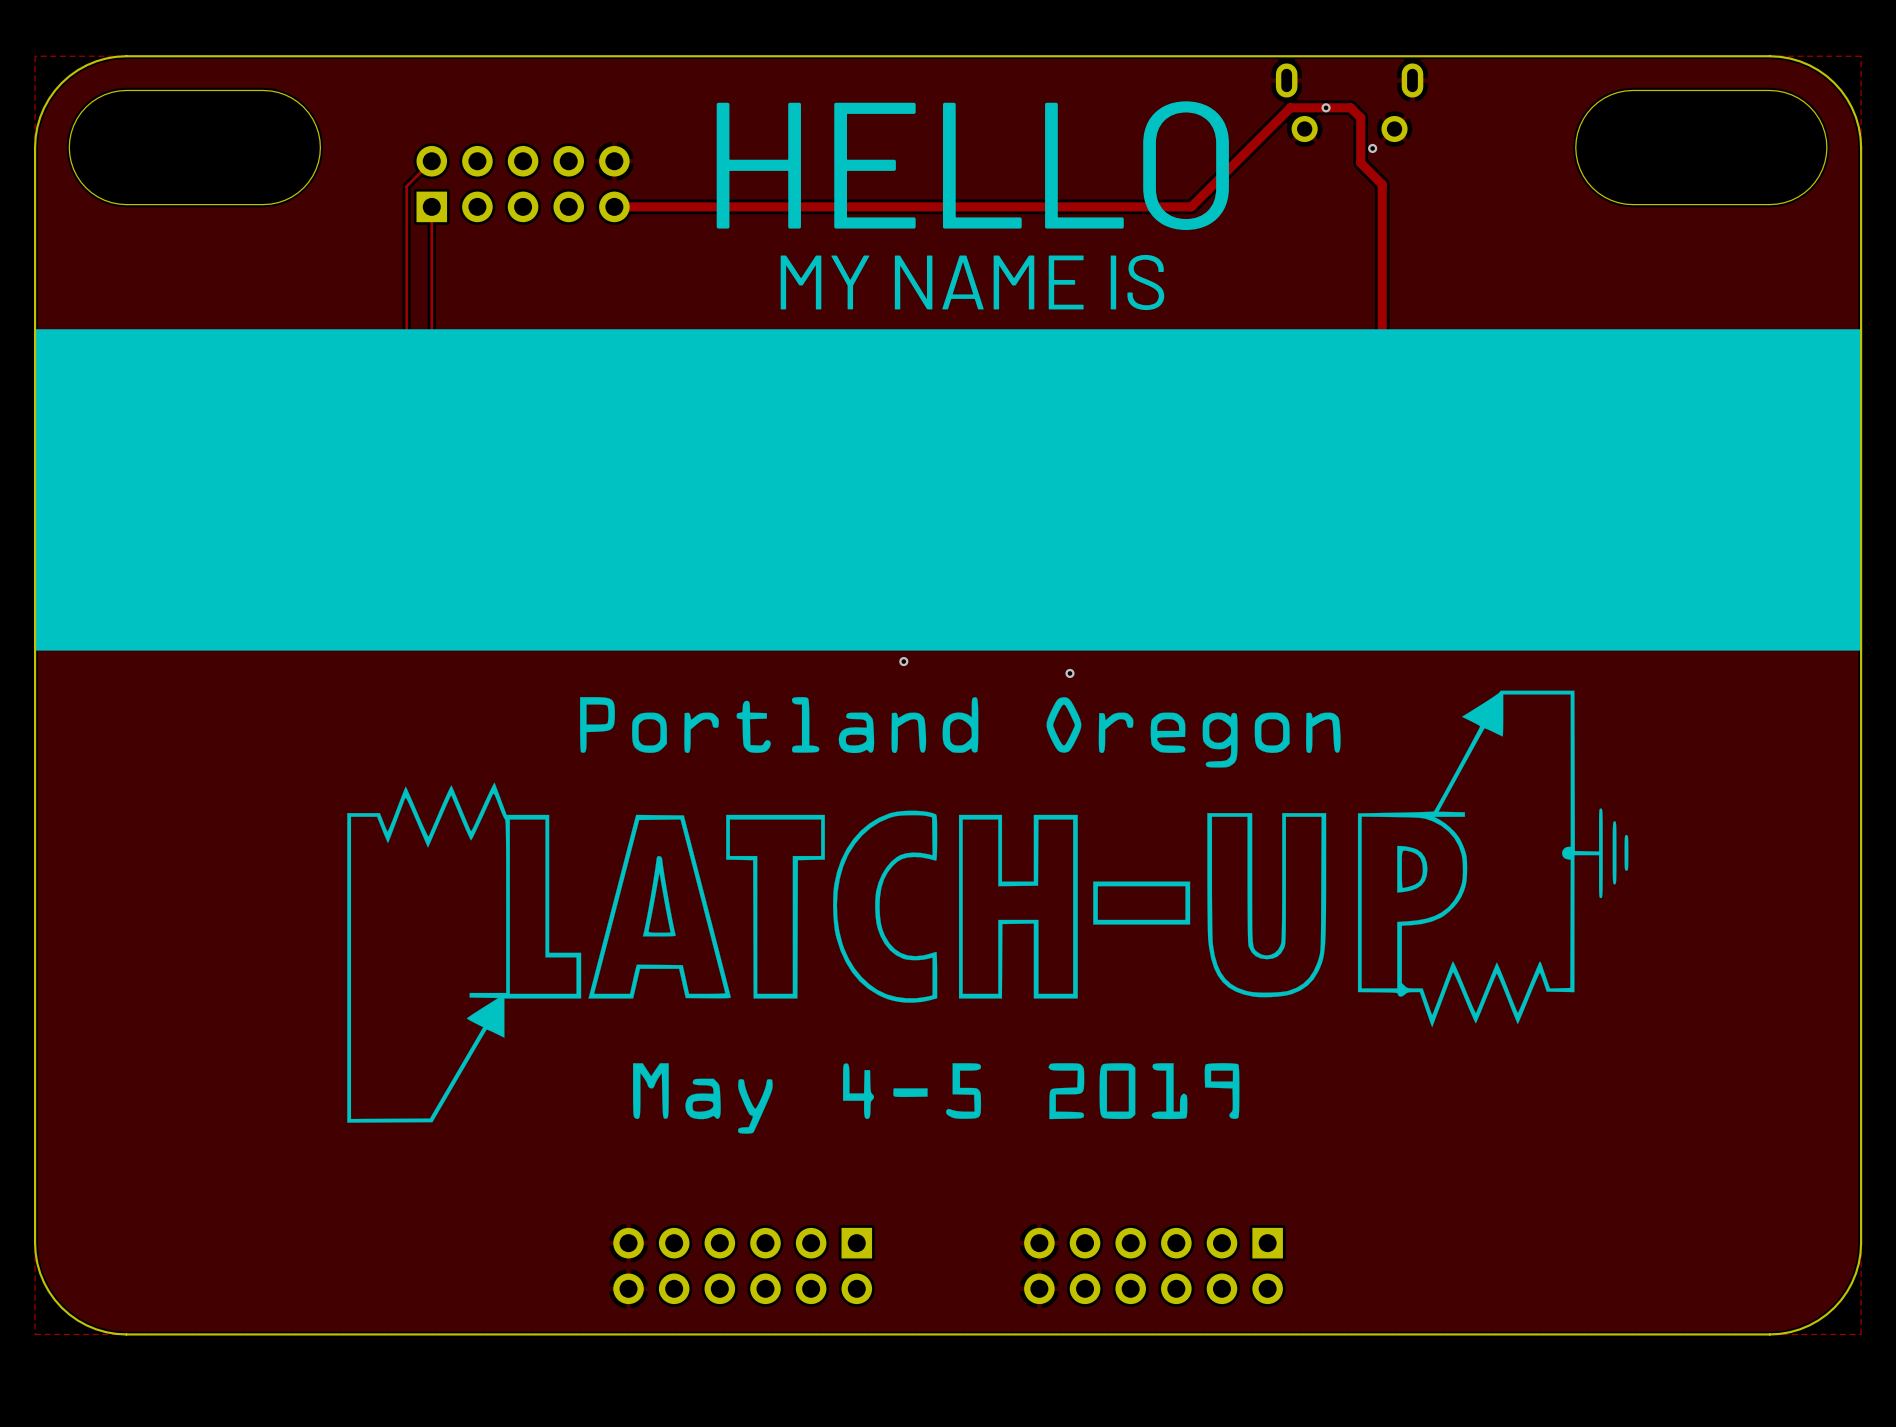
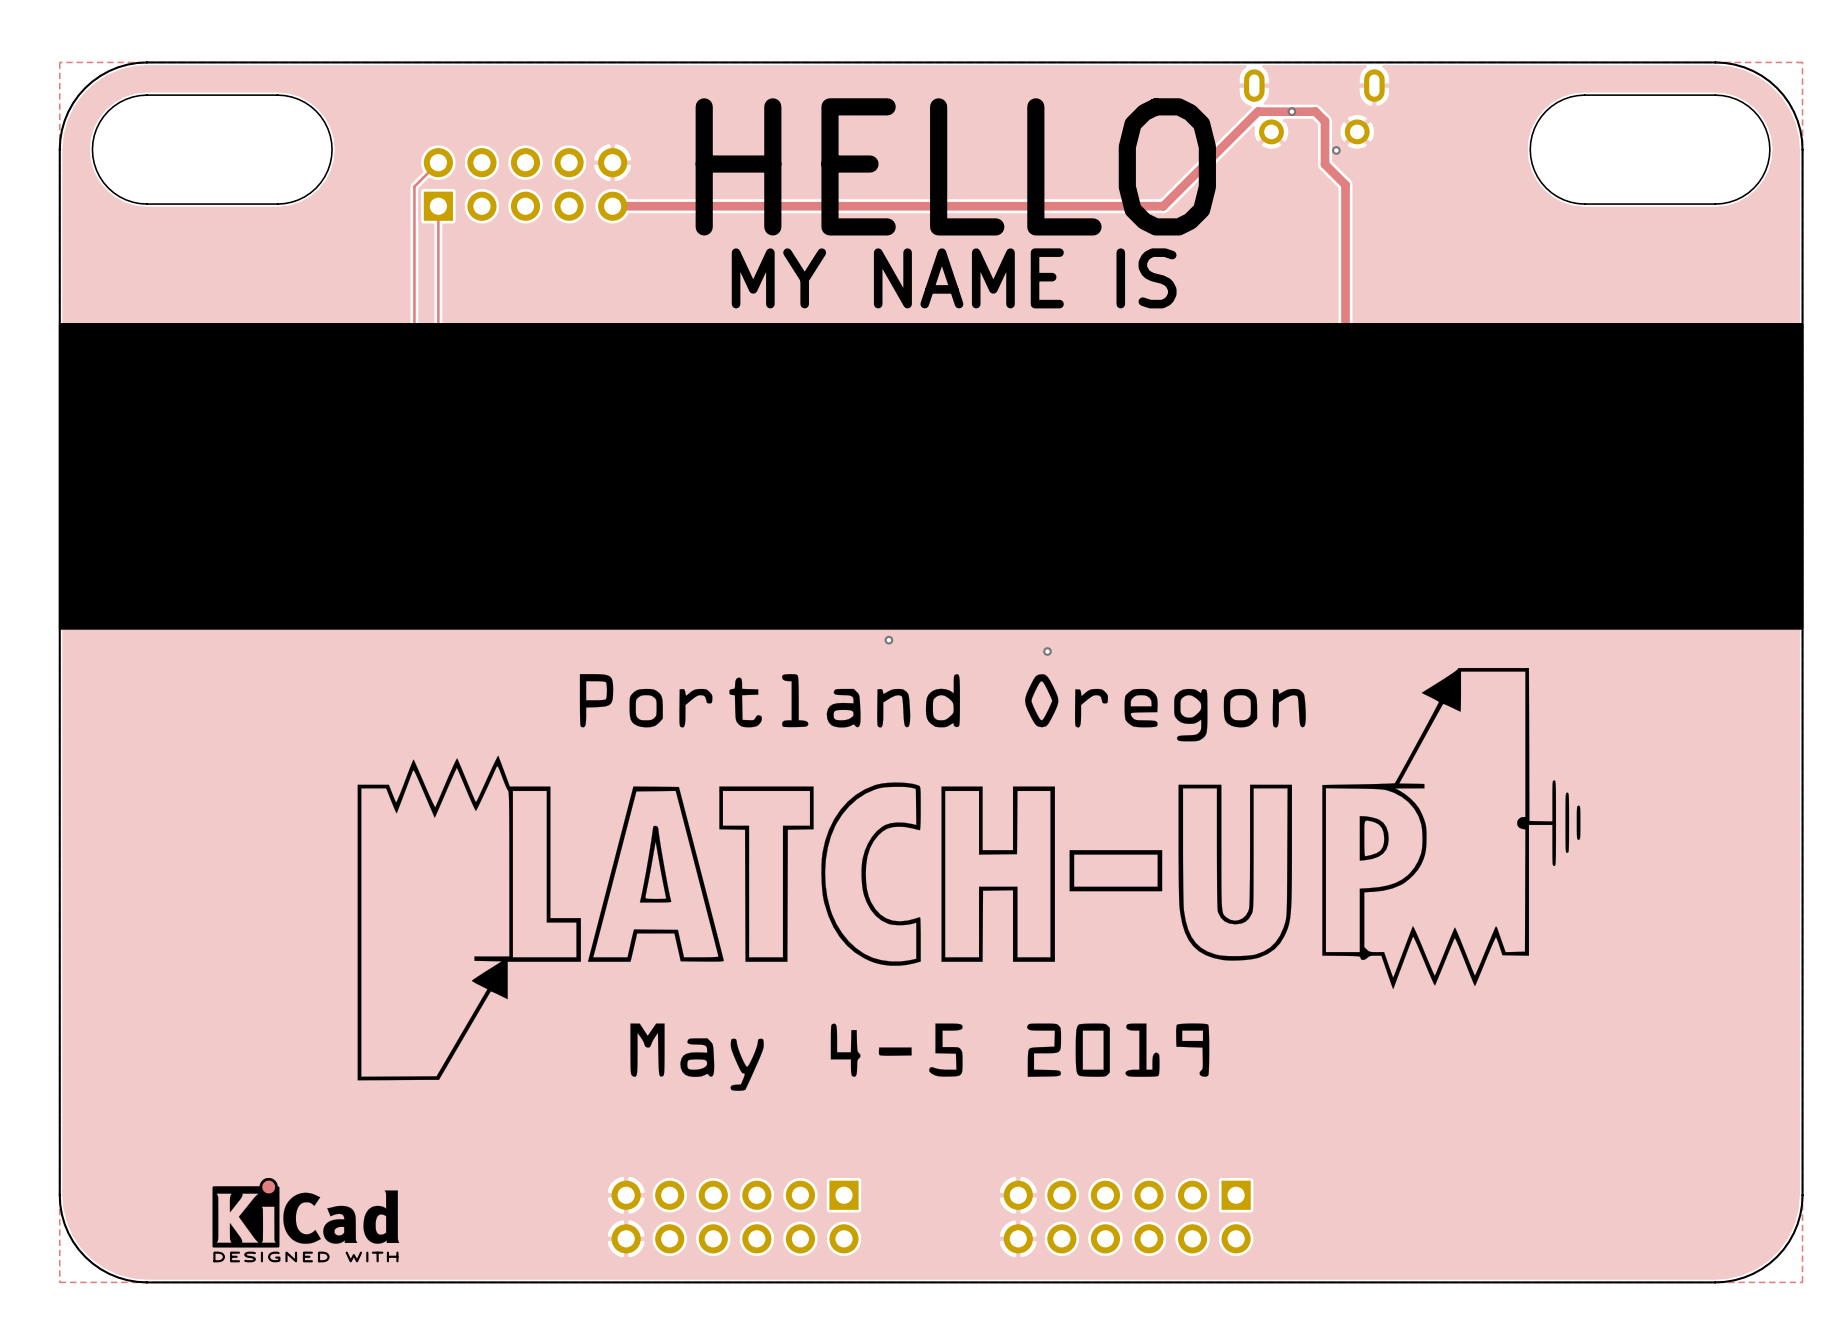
part: none -> (305, 1212)

